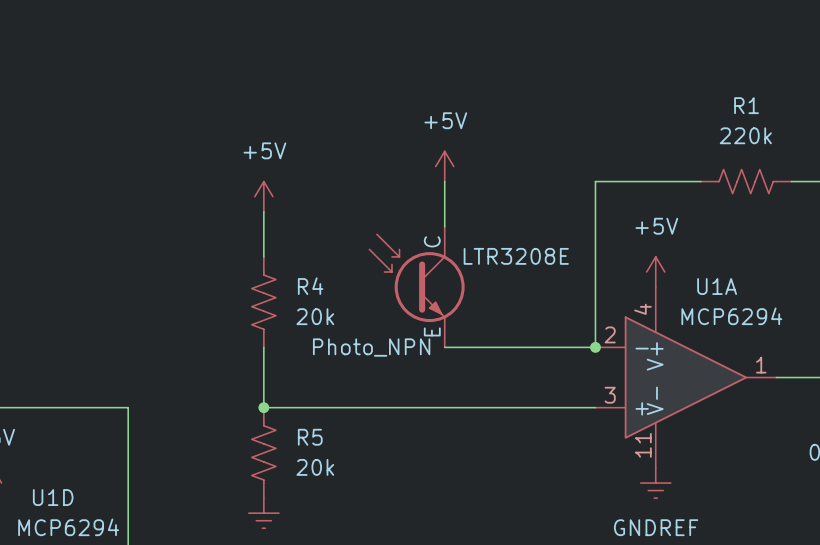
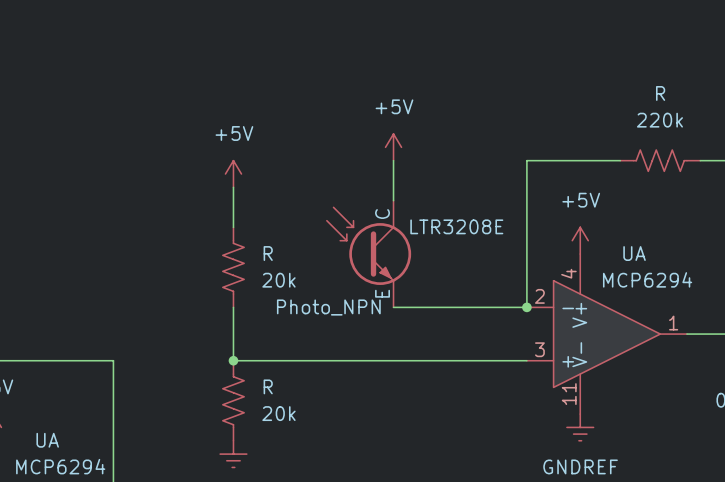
R1 name: R1 (746, 105) -> R (660, 93)
R4 name: R4 (310, 286) -> R (268, 253)
U1A name: U1A (717, 286) -> UA (634, 253)
R5 name: R5 (310, 437) -> R (268, 386)
U1D name: U1D (53, 497) -> UA (47, 440)

